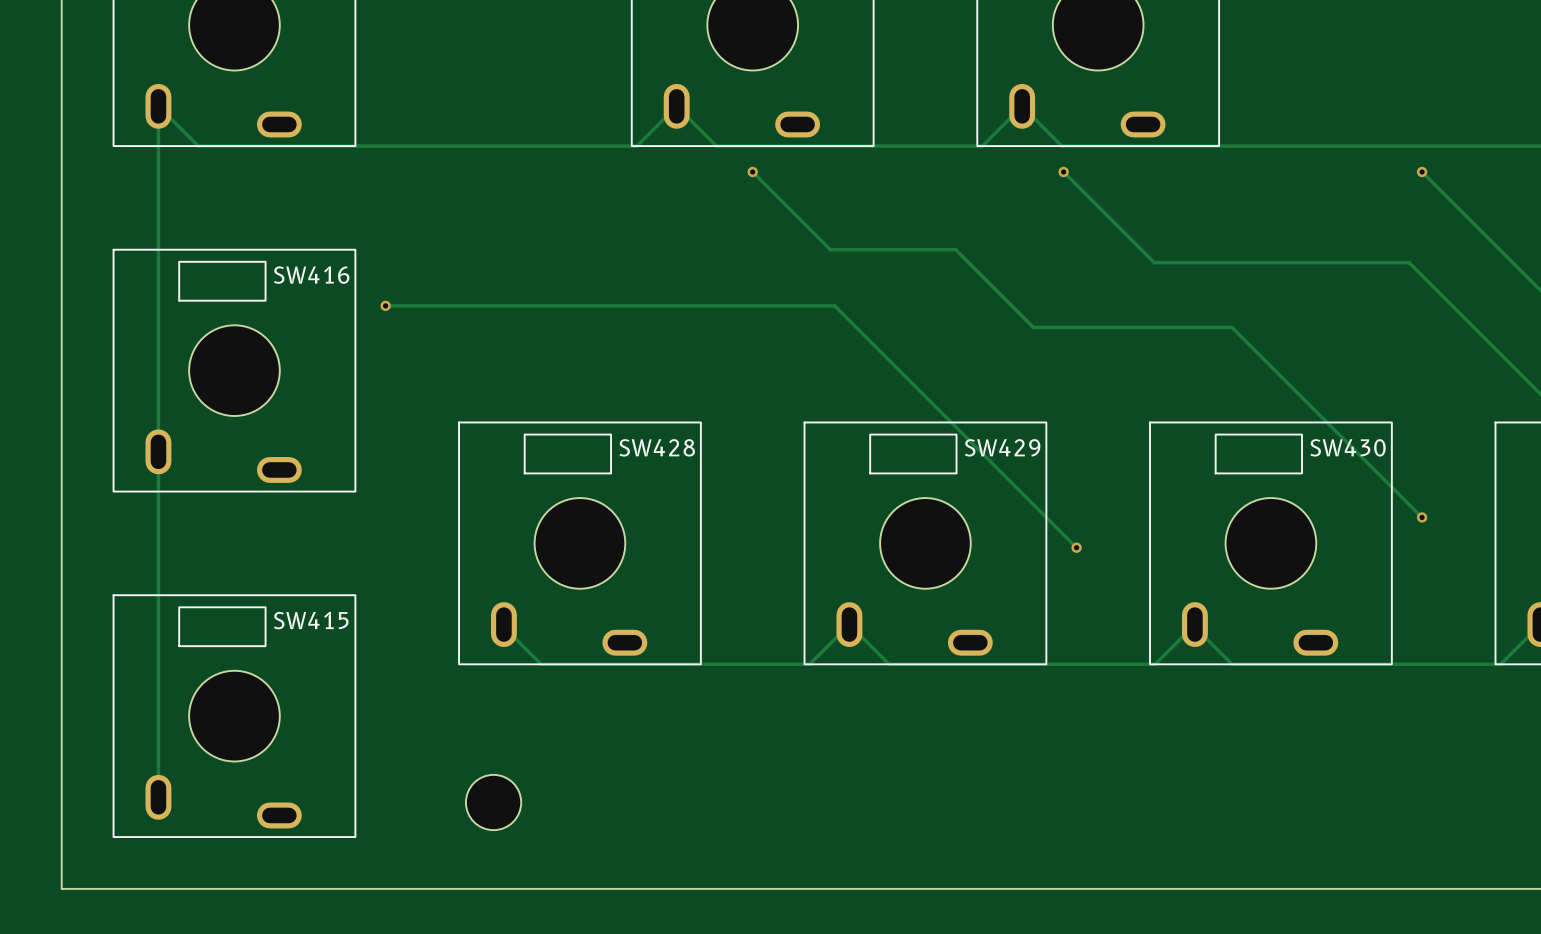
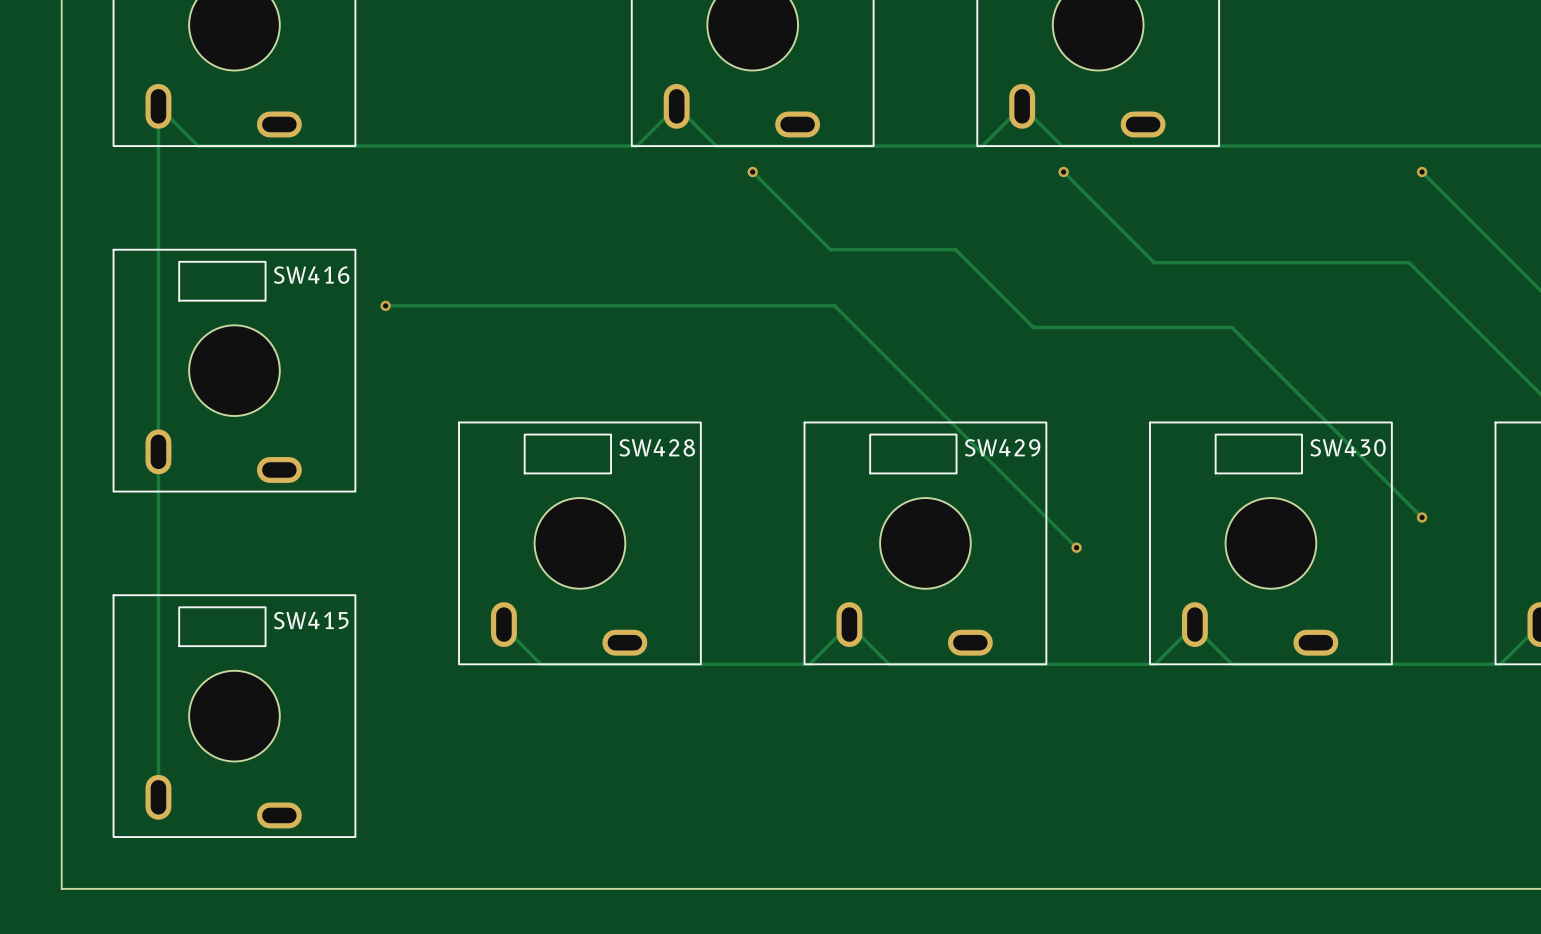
part: (493, 802) -> none

